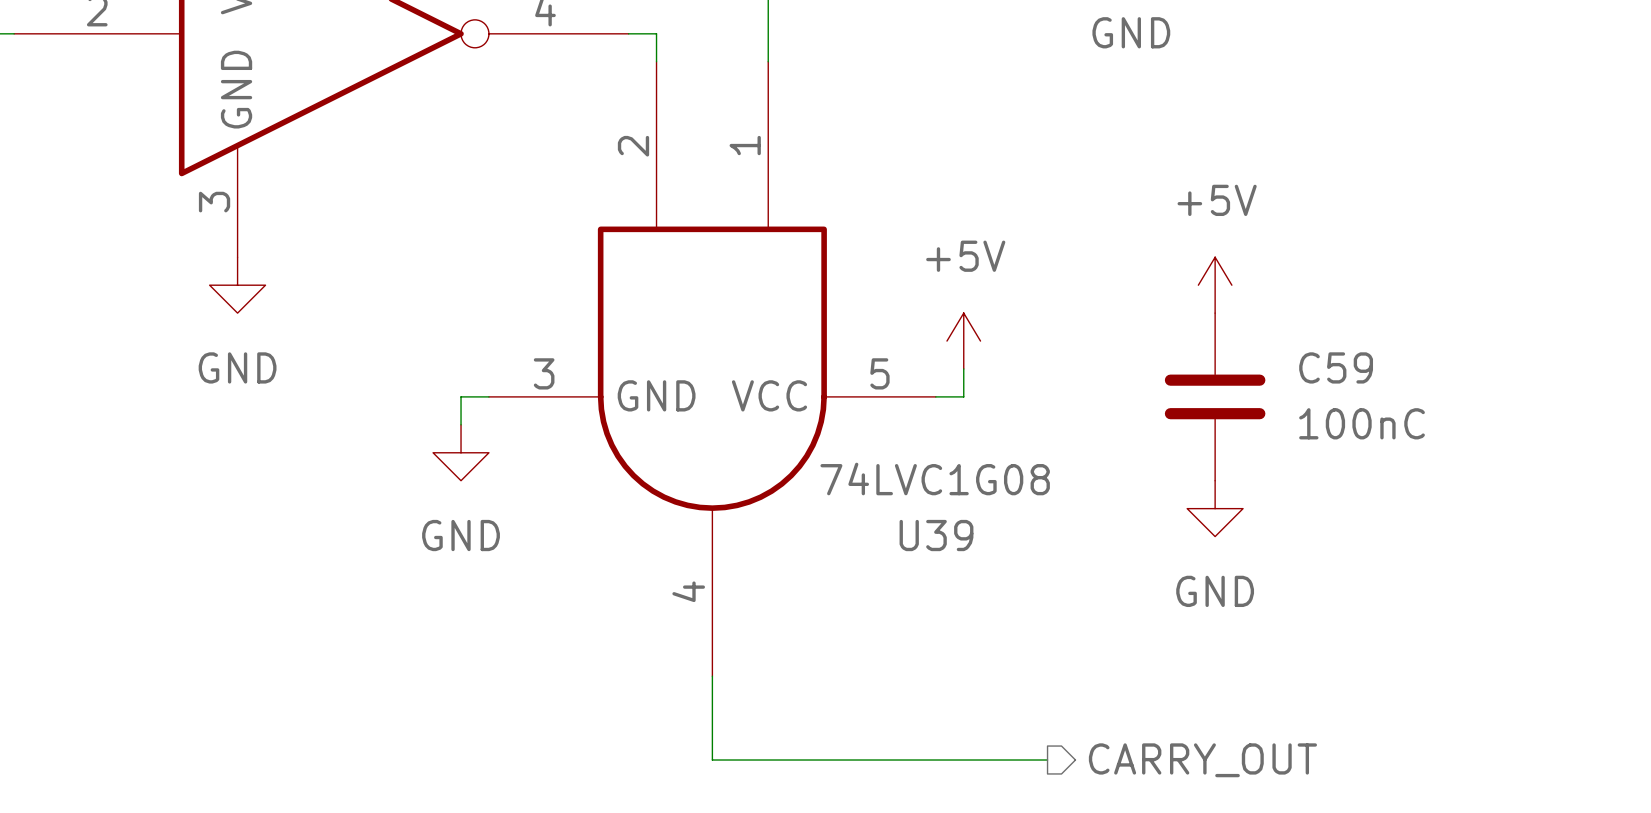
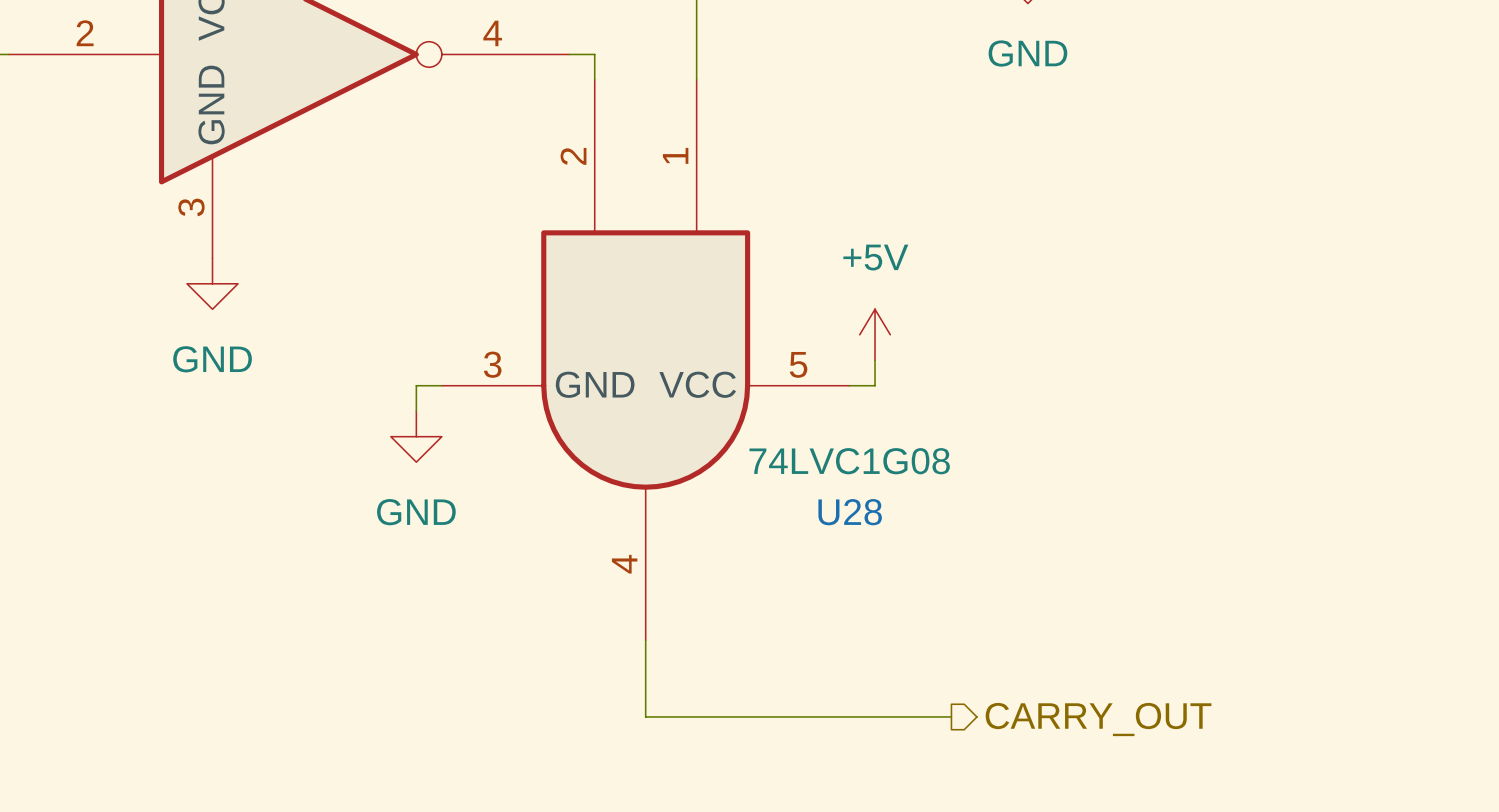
power symbol: +5V (1215, 285) -> none
C59: 100nC (1215, 396) -> none
power symbol: GND (1215, 508) -> none
U39 name: U39 (936, 535) -> U28 (850, 512)

